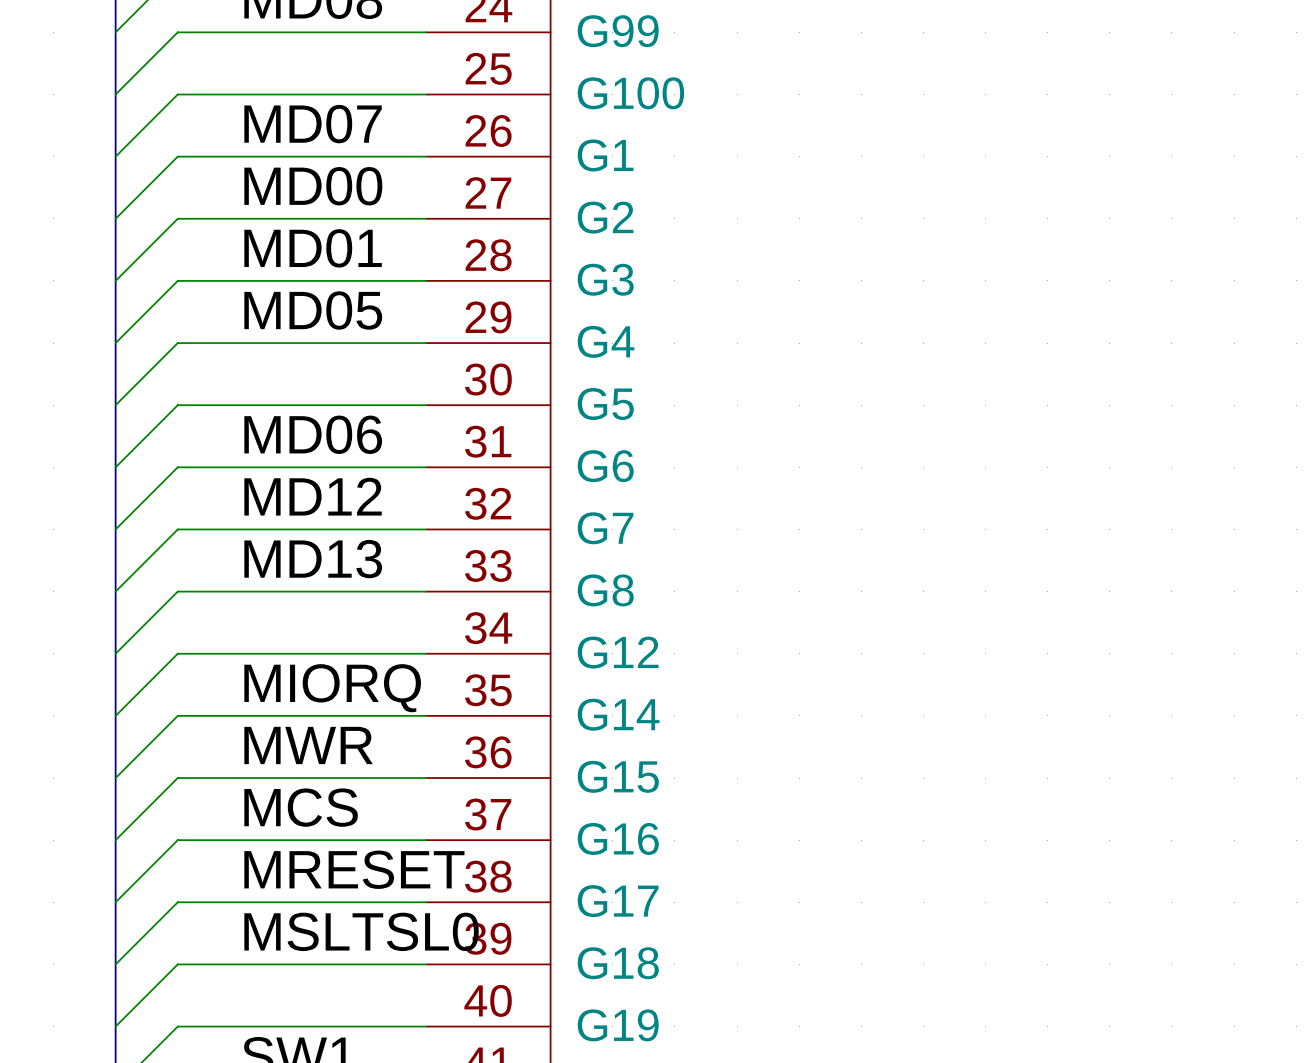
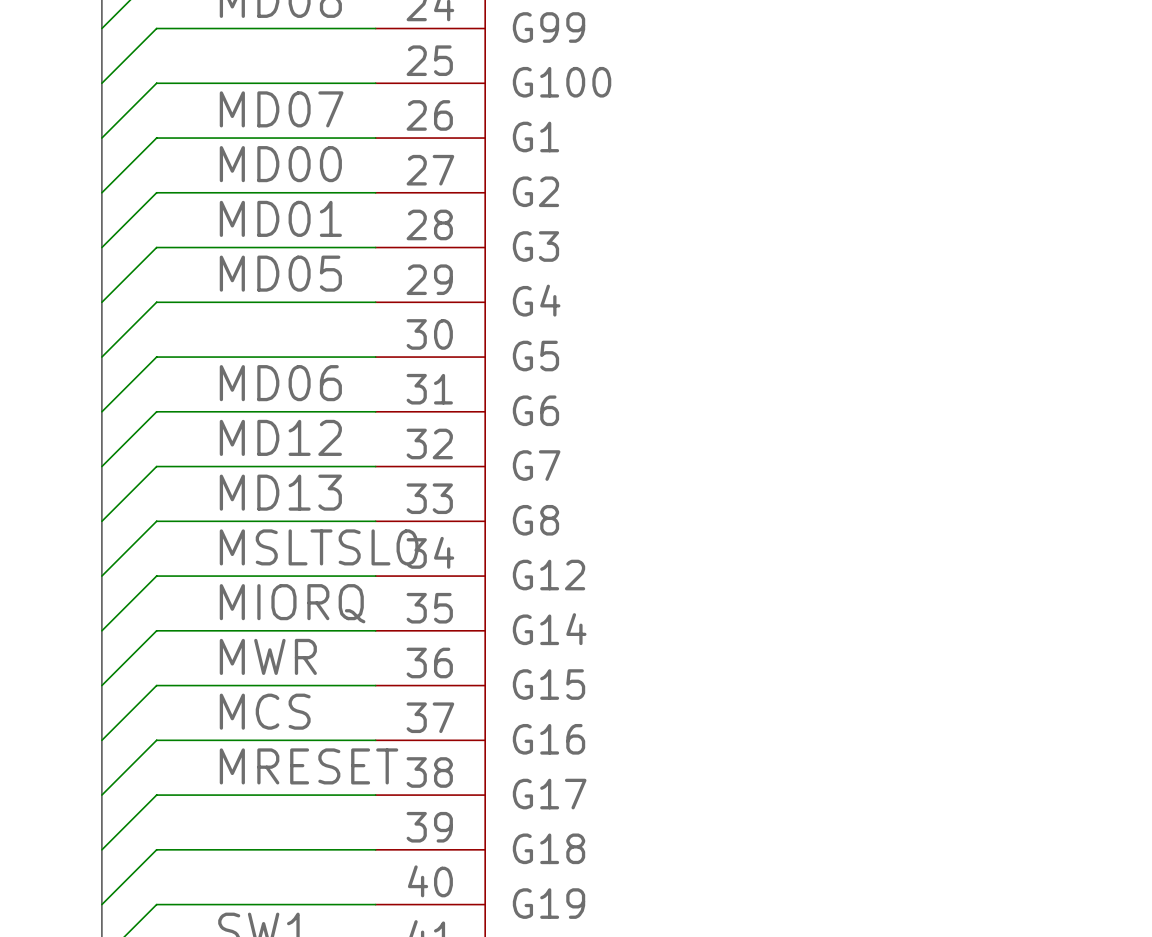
label position: MSLTSL0 (361, 931) -> MSLTSL0 (319, 547)

